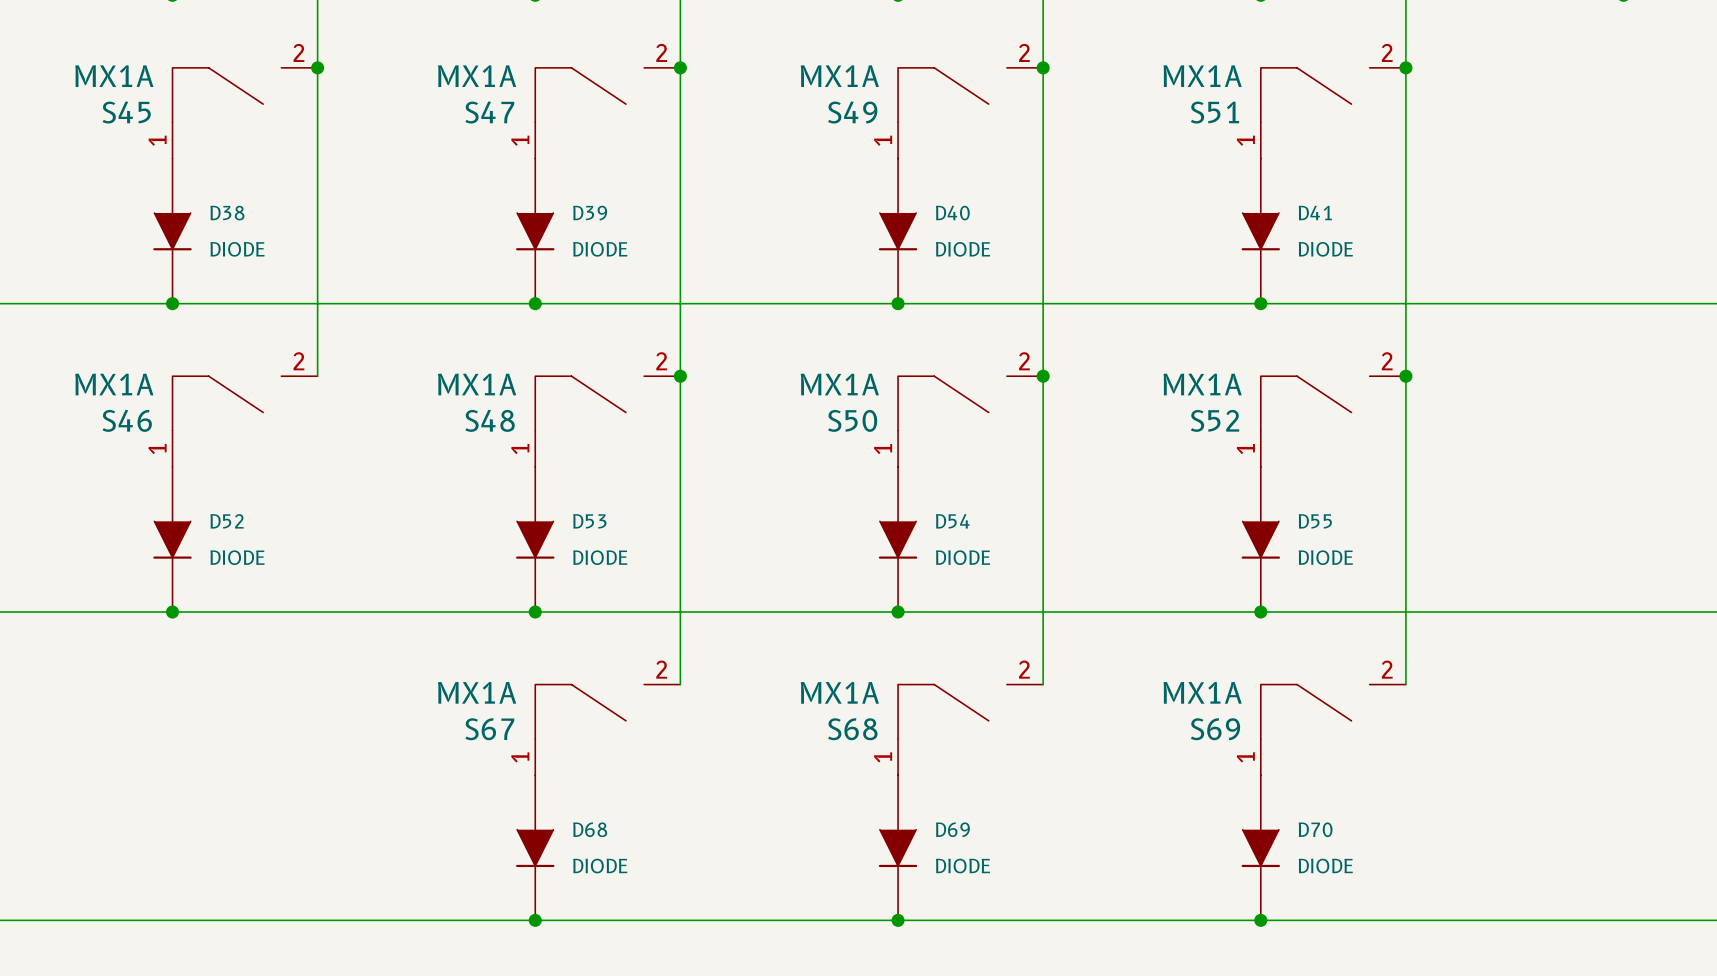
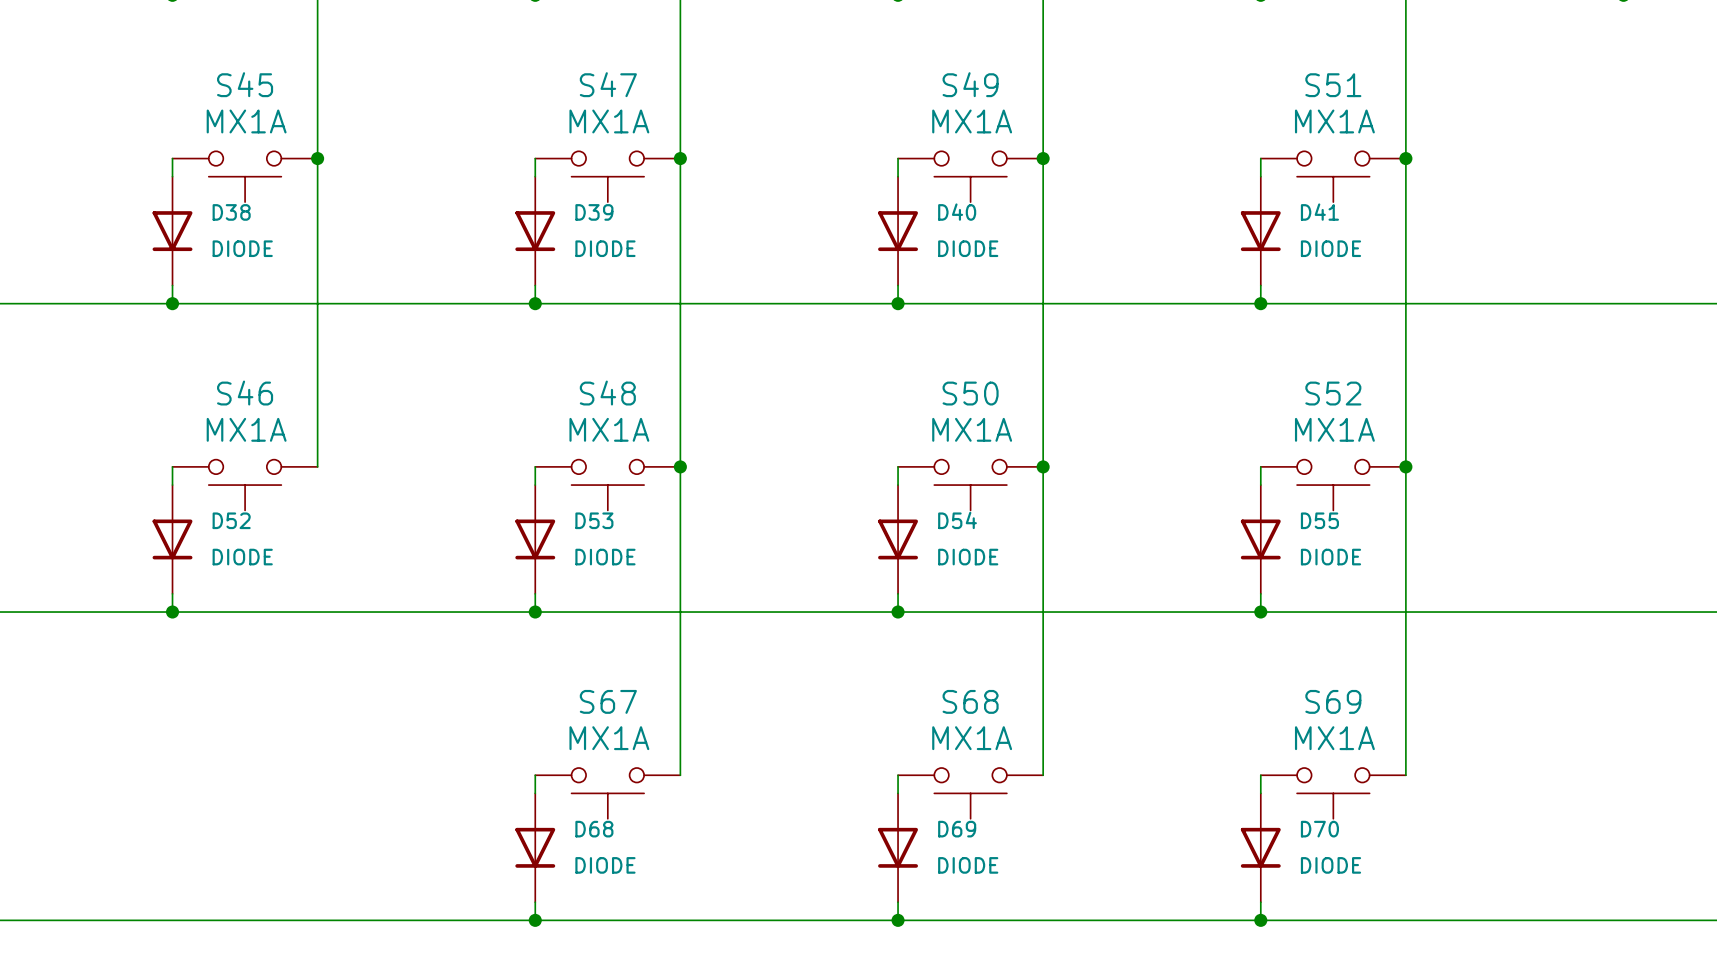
S45 symbol: [172, 67, 318, 159] -> [172, 151, 318, 203]
junction: (317, 67) -> none
S47 symbol: [535, 67, 681, 159] -> [535, 151, 681, 203]
junction: (680, 67) -> none
S49 symbol: [898, 67, 1044, 159] -> [898, 151, 1044, 203]
junction: (1043, 67) -> none
S51 symbol: [1260, 67, 1406, 159] -> [1260, 151, 1406, 203]
junction: (1405, 67) -> none
S45 value position: MX1A (114, 76) -> MX1A (246, 121)
S47 value position: MX1A (477, 76) -> MX1A (609, 121)
S49 value position: MX1A (839, 76) -> MX1A (972, 121)
S51 value position: MX1A (1202, 76) -> MX1A (1334, 121)
S45 name position: S45 (126, 112) -> S45 (245, 84)
S47 name position: S47 (489, 112) -> S47 (608, 84)
S49 name position: S49 (852, 112) -> S49 (970, 84)
S51 name position: S51 (1214, 112) -> S51 (1333, 85)
D38 symbol: [153, 158, 192, 304] -> [152, 176, 193, 286]
junction: none -> (317, 158)
D39 symbol: [516, 158, 555, 304] -> [515, 176, 556, 286]
junction: none -> (680, 158)
D40 symbol: [878, 158, 918, 304] -> [878, 176, 918, 286]
junction: none -> (1043, 158)
D41 symbol: [1241, 158, 1281, 304] -> [1240, 176, 1281, 286]
junction: none -> (1405, 158)
S46 symbol: [172, 376, 318, 467] -> [172, 459, 318, 511]
wire: none -> (317, 376) (317, 466)
S48 symbol: [535, 376, 681, 467] -> [535, 459, 681, 511]
junction: (680, 376) -> none
S50 symbol: [898, 376, 1044, 467] -> [898, 459, 1044, 511]
junction: (1043, 376) -> none
S52 symbol: [1260, 376, 1406, 467] -> [1260, 459, 1406, 511]
junction: (1405, 376) -> none
S46 value position: MX1A (114, 384) -> MX1A (246, 429)
S48 value position: MX1A (477, 384) -> MX1A (609, 429)
S50 value position: MX1A (839, 384) -> MX1A (972, 429)
S52 value position: MX1A (1202, 384) -> MX1A (1334, 429)
S46 name position: S46 (127, 420) -> S46 (245, 393)
S48 name position: S48 (490, 420) -> S48 (607, 393)
S50 name position: S50 (852, 420) -> S50 (970, 393)
S52 name position: S52 (1215, 420) -> S52 (1333, 393)
D52 symbol: [153, 466, 192, 613] -> [152, 485, 193, 594]
D53 symbol: [516, 466, 555, 613] -> [515, 485, 556, 594]
junction: none -> (680, 466)
D54 symbol: [878, 466, 918, 613] -> [878, 485, 918, 594]
junction: none -> (1043, 466)
D55 symbol: [1241, 466, 1281, 613] -> [1240, 485, 1281, 594]
junction: none -> (1405, 466)
S67 symbol: [535, 684, 681, 776] -> [535, 768, 681, 819]
wire: none -> (680, 684) (680, 775)
S68 symbol: [898, 684, 1044, 776] -> [898, 768, 1044, 819]
wire: none -> (1043, 684) (1043, 775)
S69 symbol: [1260, 684, 1406, 776] -> [1260, 768, 1406, 819]
wire: none -> (1405, 684) (1405, 775)
S67 value position: MX1A (477, 692) -> MX1A (609, 738)
S68 value position: MX1A (839, 692) -> MX1A (972, 738)
S69 value position: MX1A (1202, 692) -> MX1A (1334, 738)
S67 name position: S67 (489, 729) -> S67 (608, 701)
S68 name position: S68 (852, 729) -> S68 (970, 701)
S69 name position: S69 (1215, 729) -> S69 (1333, 701)
D68 symbol: [516, 775, 555, 921] -> [515, 793, 556, 903]
D69 symbol: [878, 775, 918, 921] -> [878, 793, 918, 903]
D70 symbol: [1241, 775, 1281, 921] -> [1240, 793, 1281, 903]

